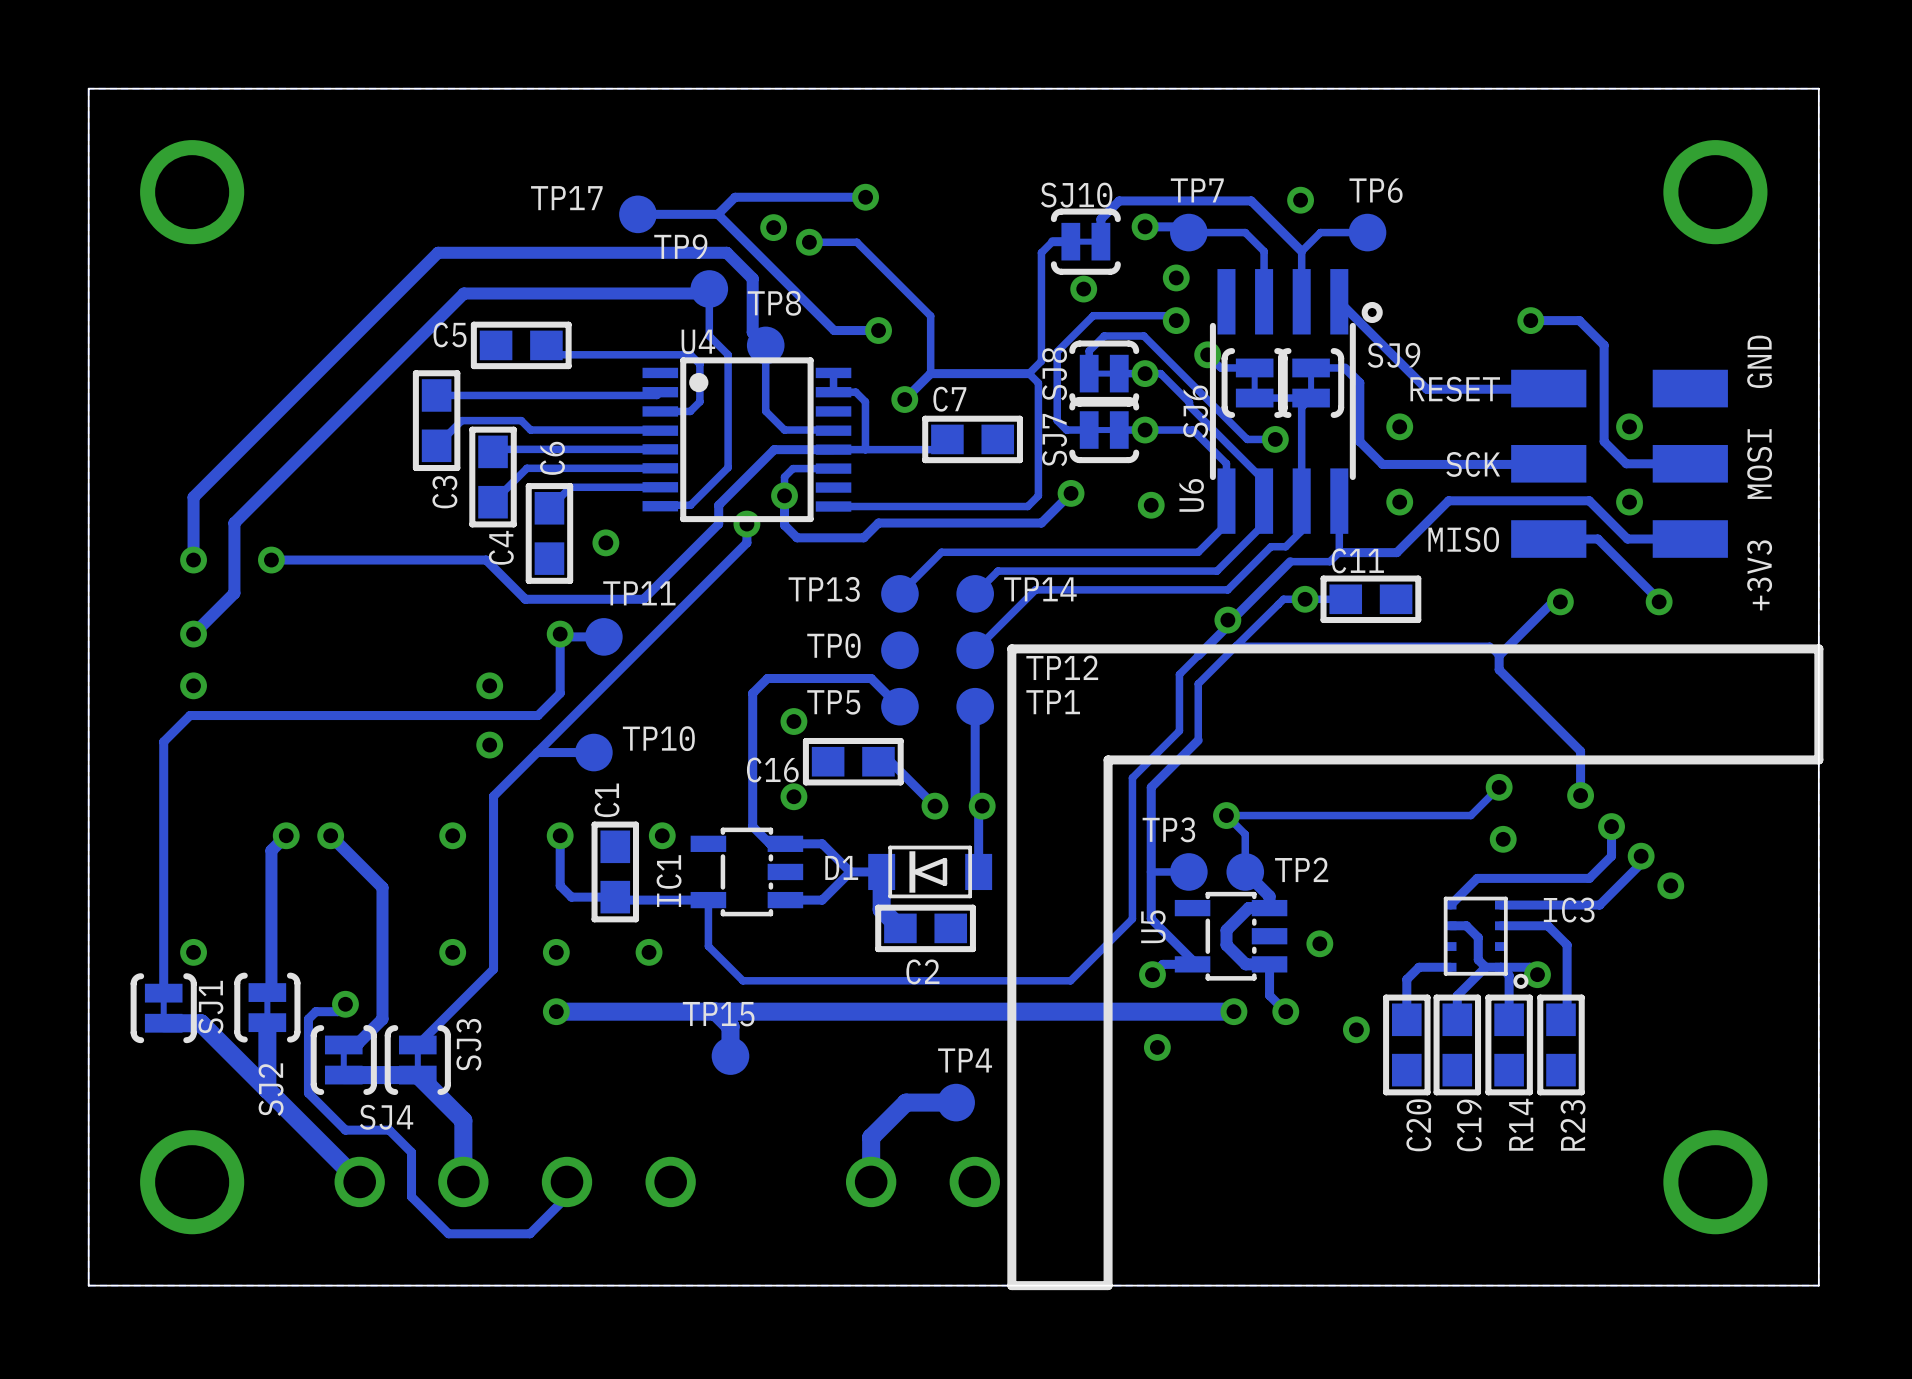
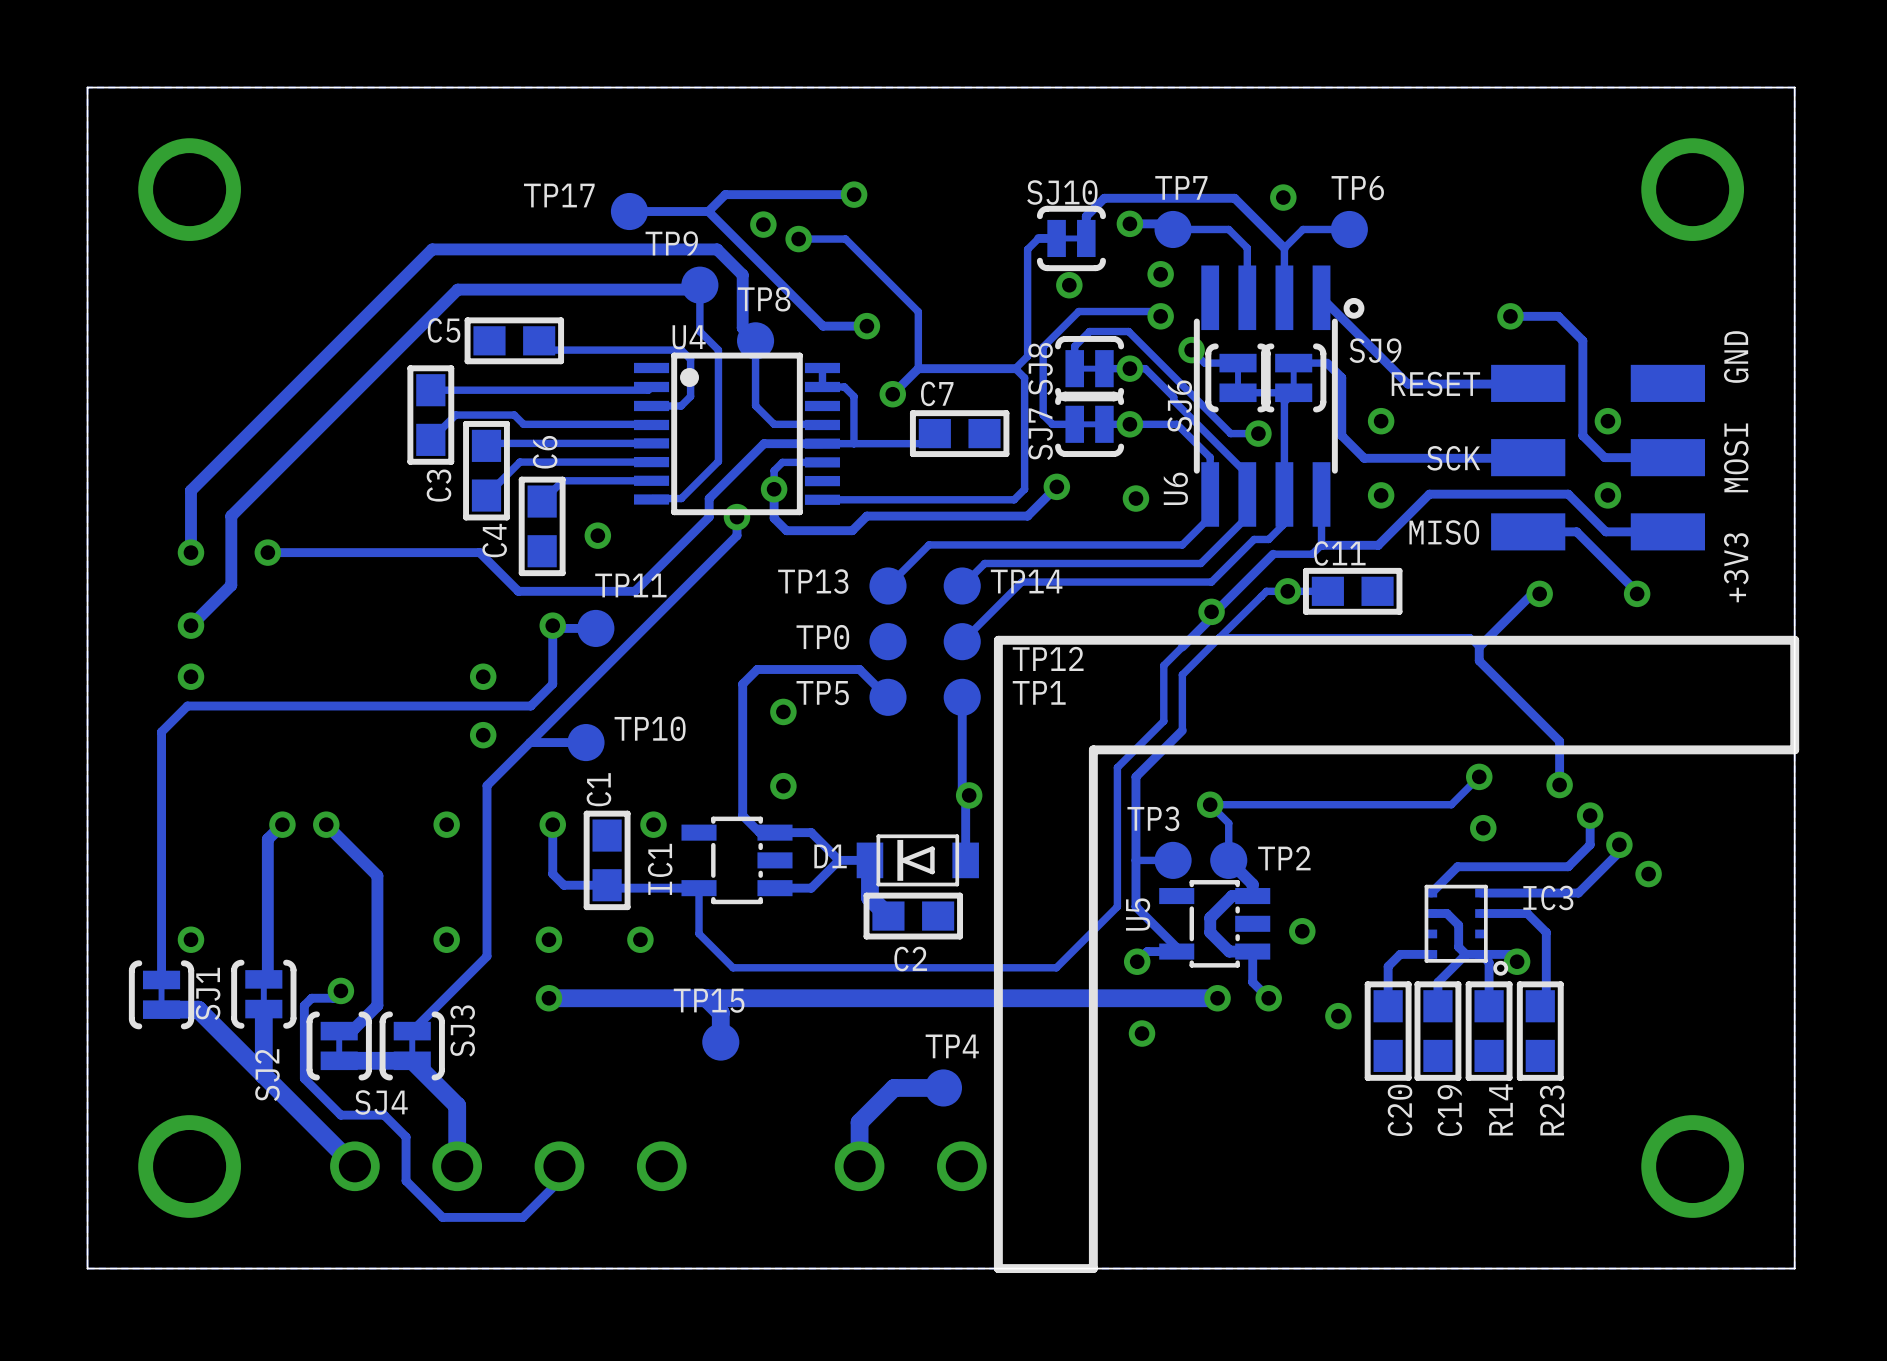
C16: (853, 761) -> none
track: (878, 761) (890, 761) (934, 806) -> none
via: (934, 806) -> none

